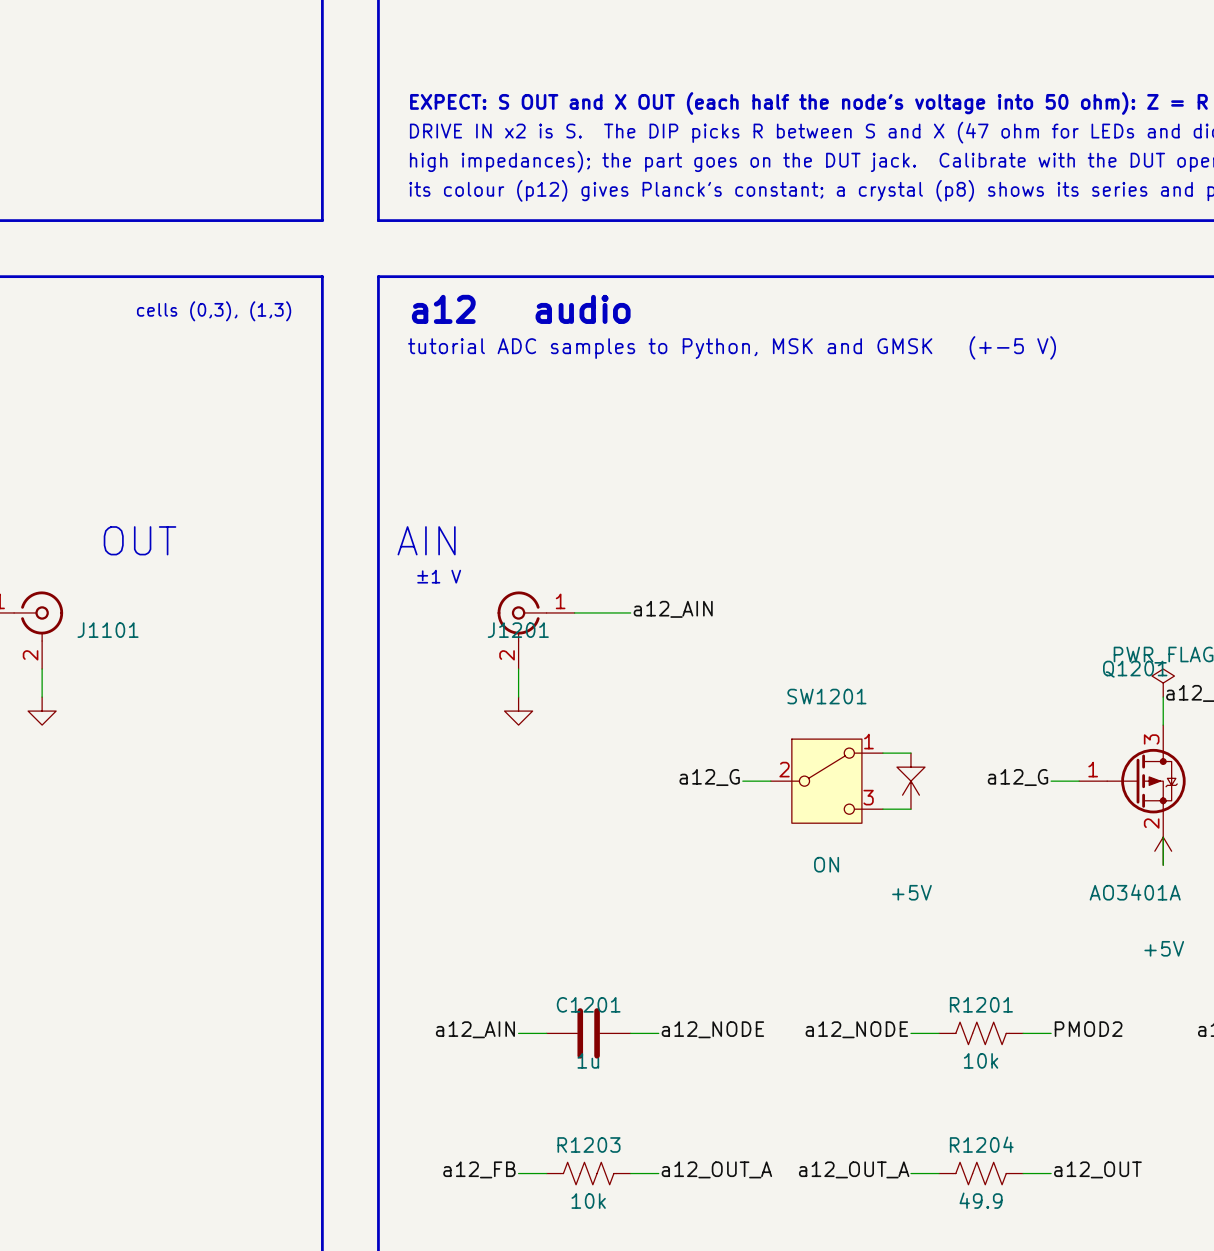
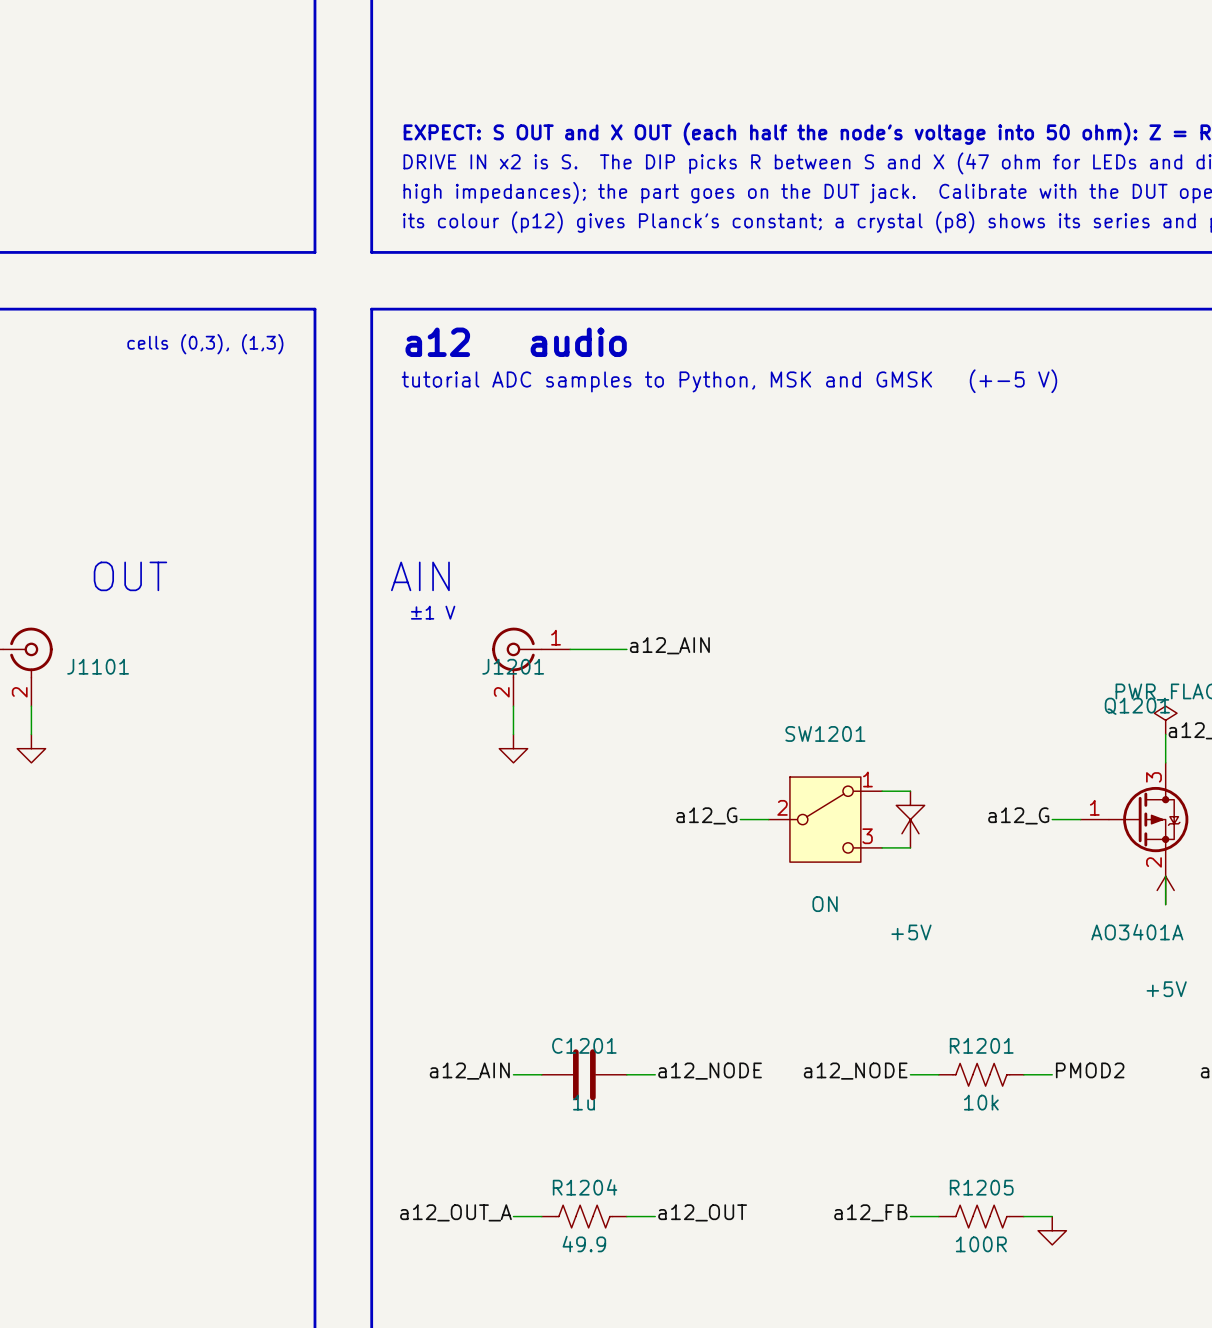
R1203 name: R1203 (588, 1144) -> R1204 (585, 1187)
R1204 name: R1204 (981, 1144) -> R1205 (981, 1187)
label: a12_FB (479, 1169) -> a12_OUT_A (455, 1212)
label: a12_OUT_A (716, 1169) -> a12_OUT (702, 1212)
label: a12_OUT_A (854, 1169) -> a12_FB (870, 1212)
label: a12_OUT (1097, 1169) -> none
power symbol: none -> (1052, 1230)
R1204 value: 49.9 (981, 1200) -> 100R (981, 1244)
R1203 value: 10k (588, 1201) -> 49.9 (584, 1244)

